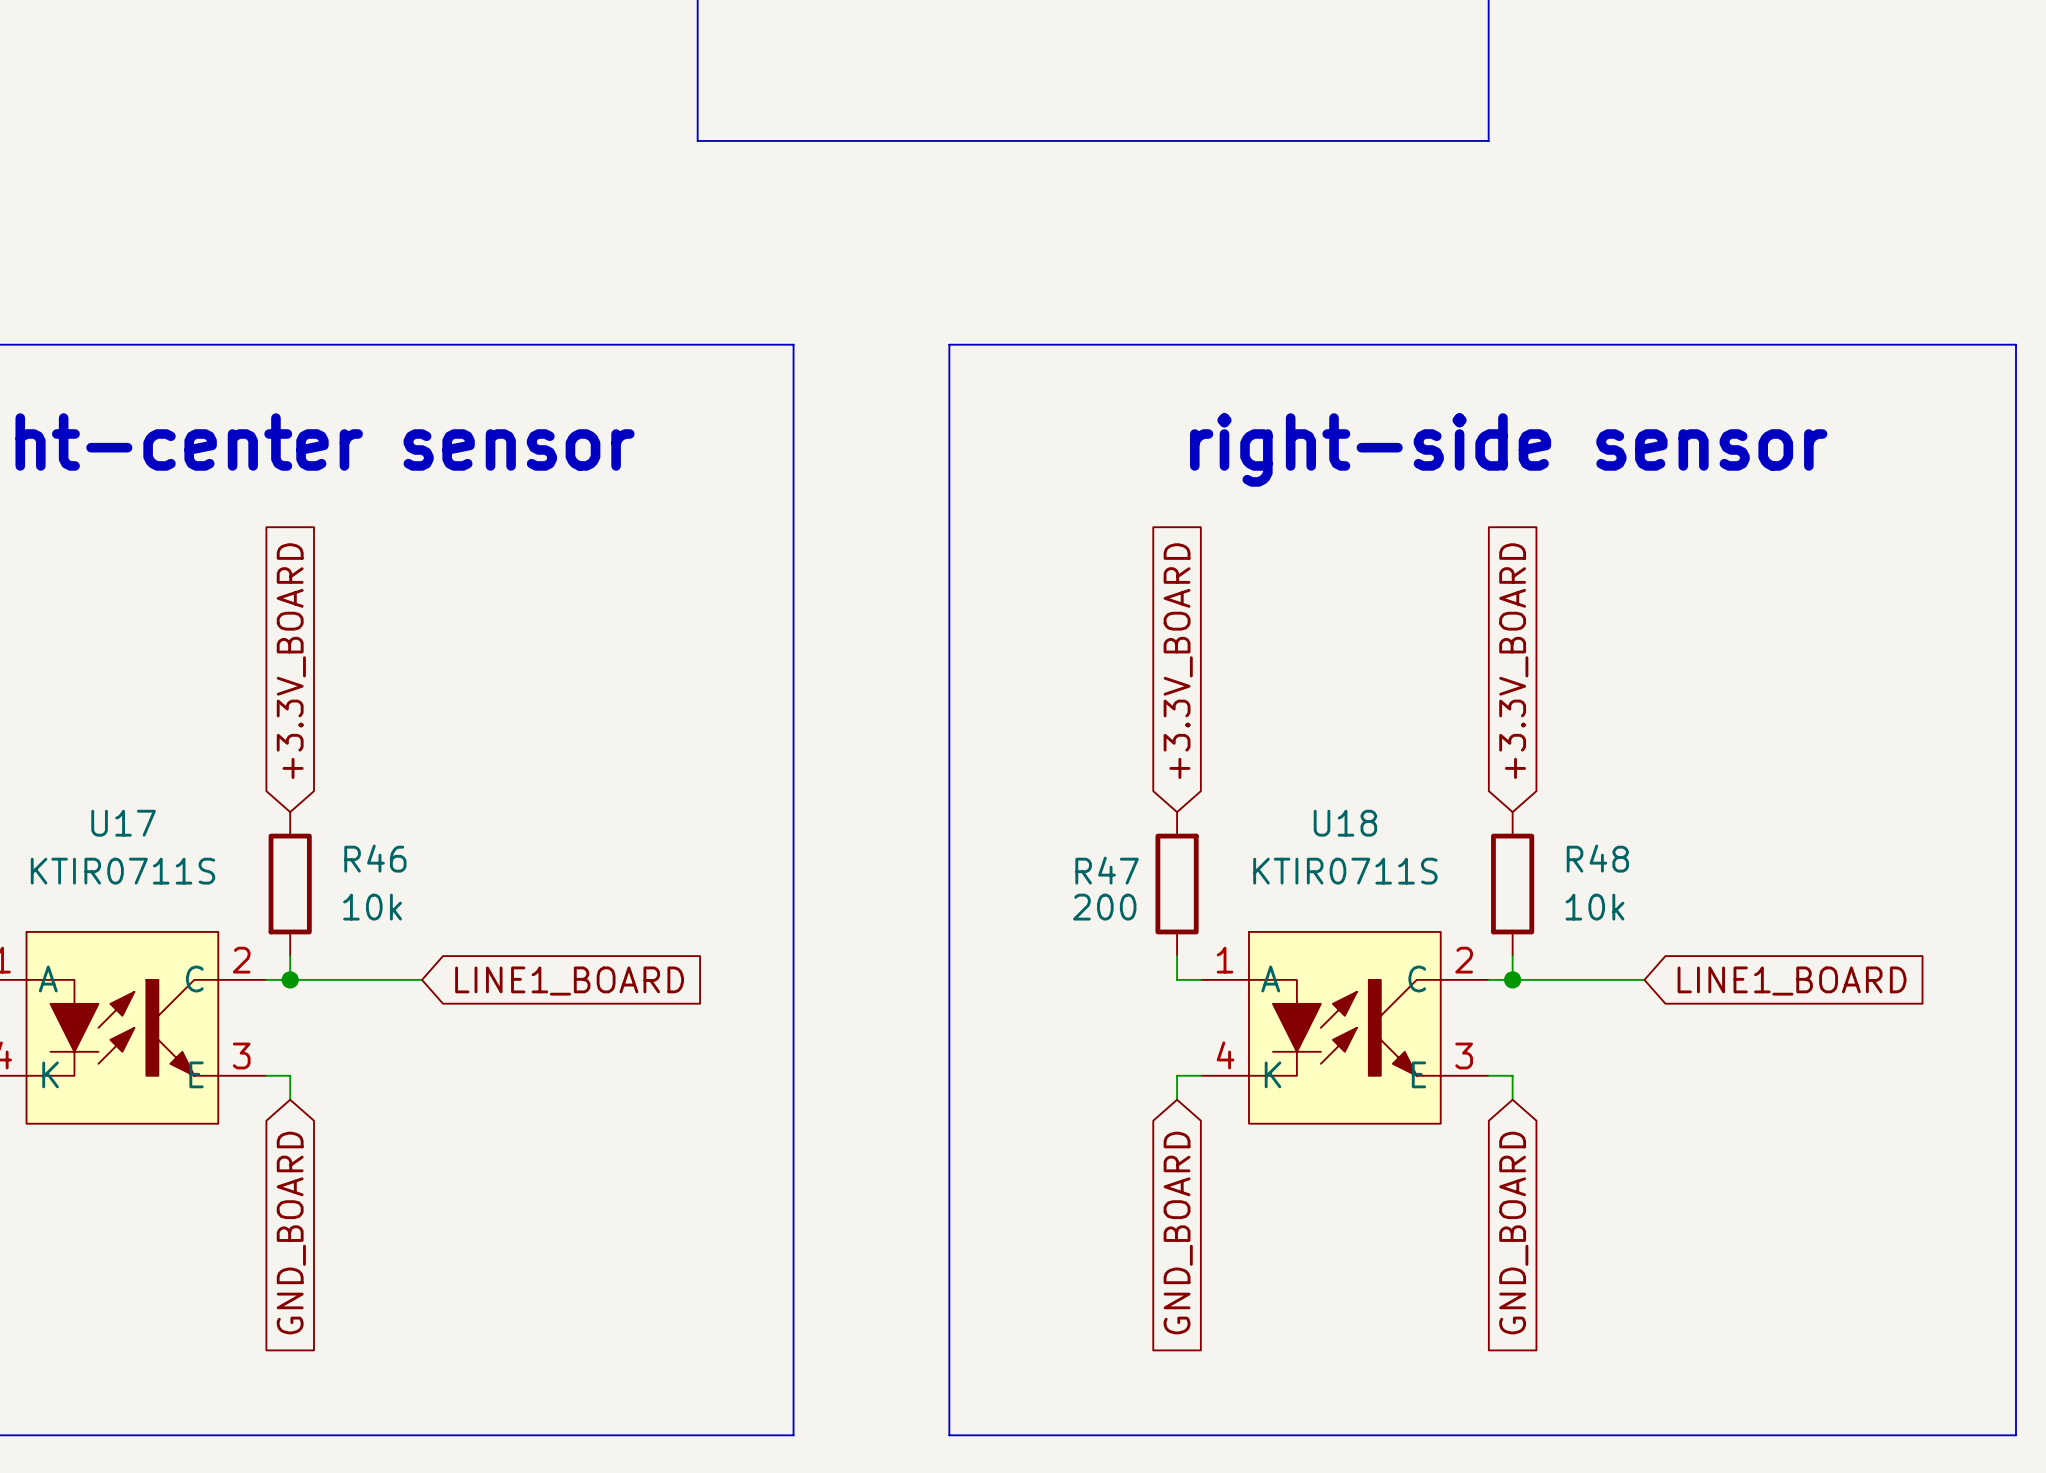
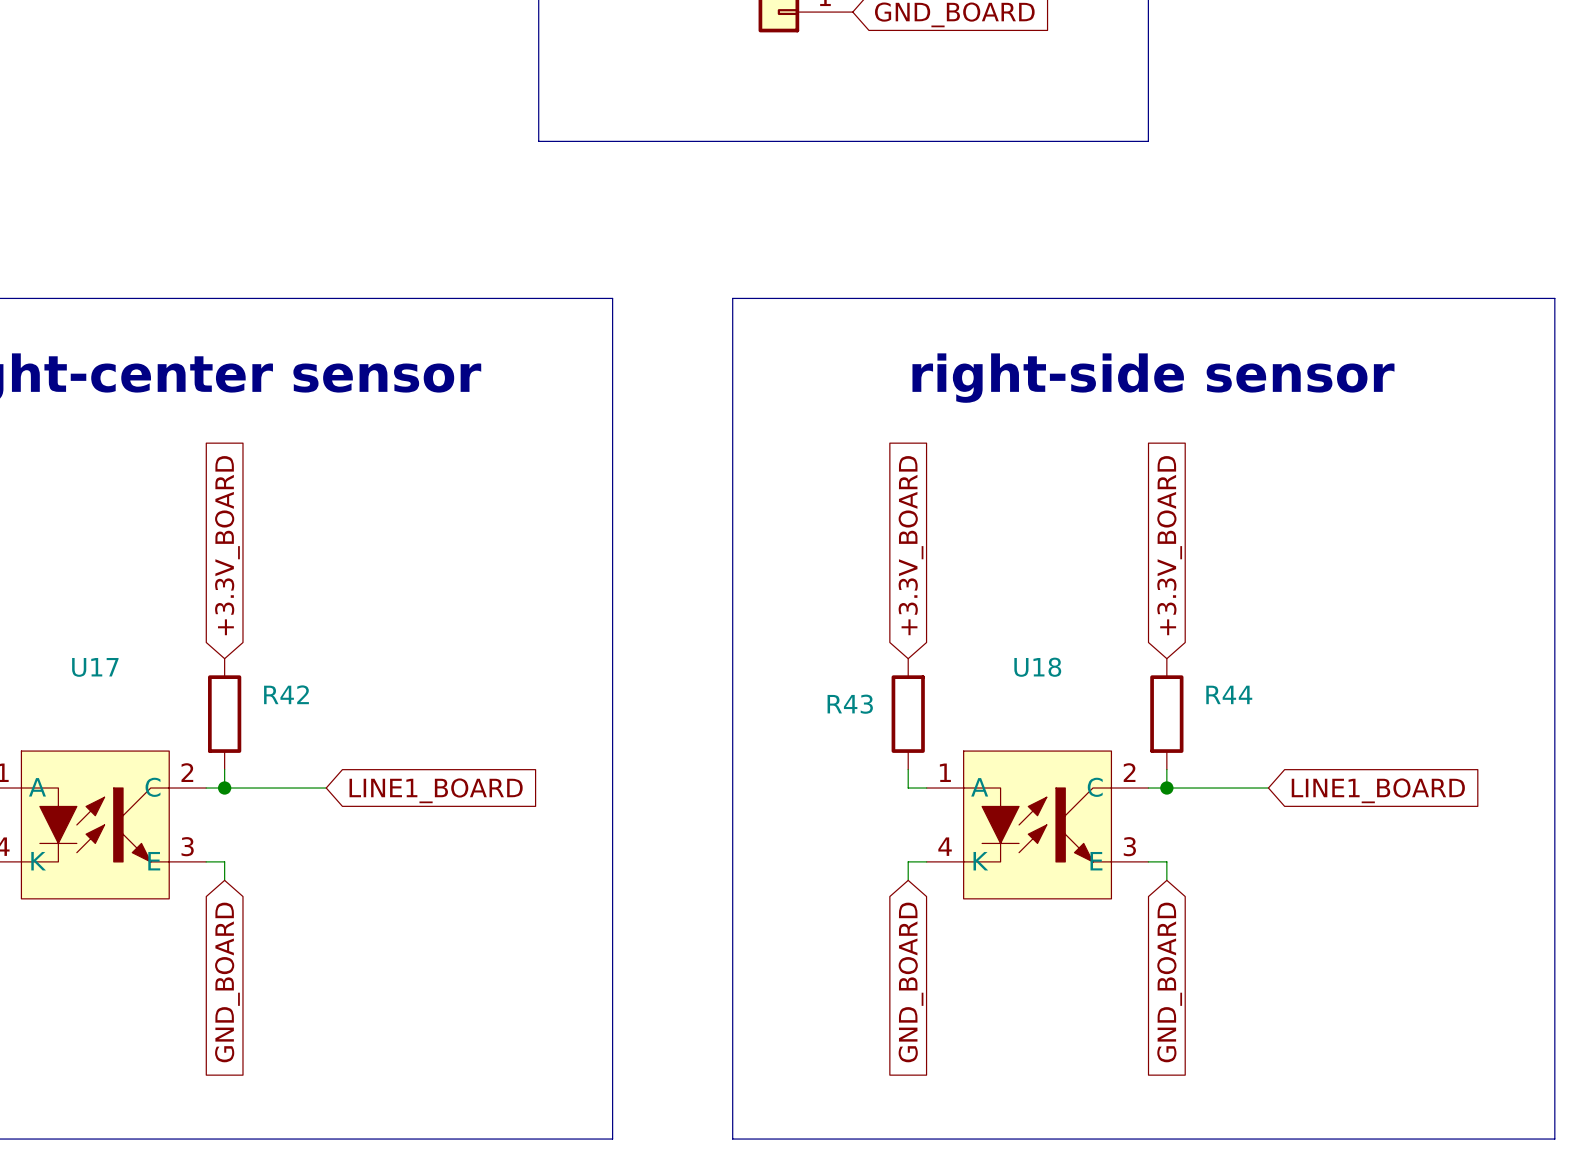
R46 name: R46 (375, 858) -> R42 (286, 694)
R48 name: R48 (1597, 858) -> R44 (1229, 694)
R47 name: R47 (1107, 870) -> R43 (850, 704)
U17 value: KTIR0711S (122, 871) -> none
U18 value: KTIR0711S (1345, 871) -> none
R46 value: 10k (372, 907) -> none
R47 value: 200 (1104, 907) -> none
R48 value: 10k (1594, 907) -> none

